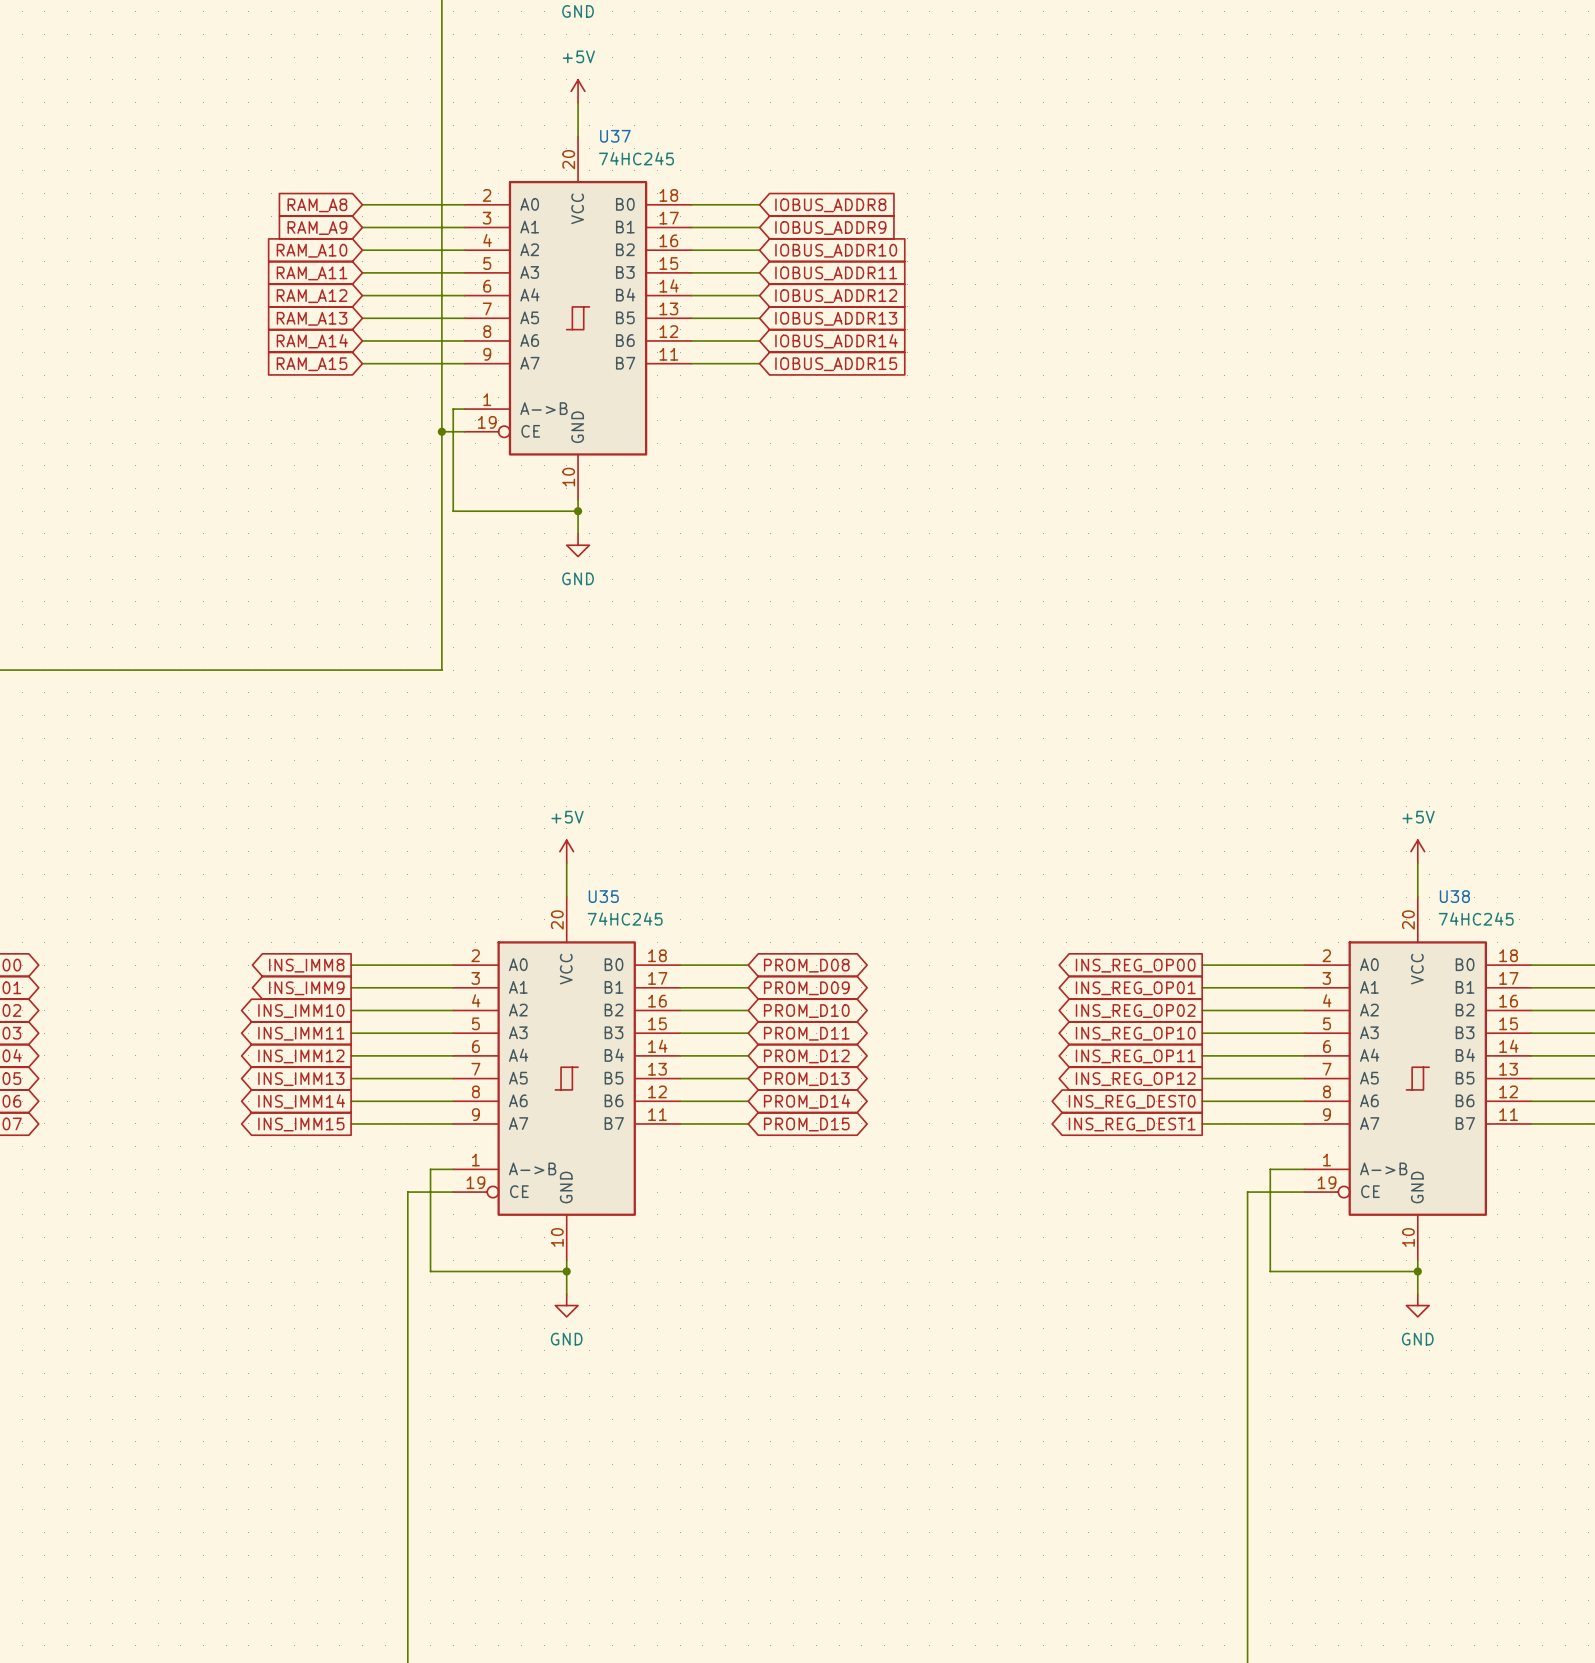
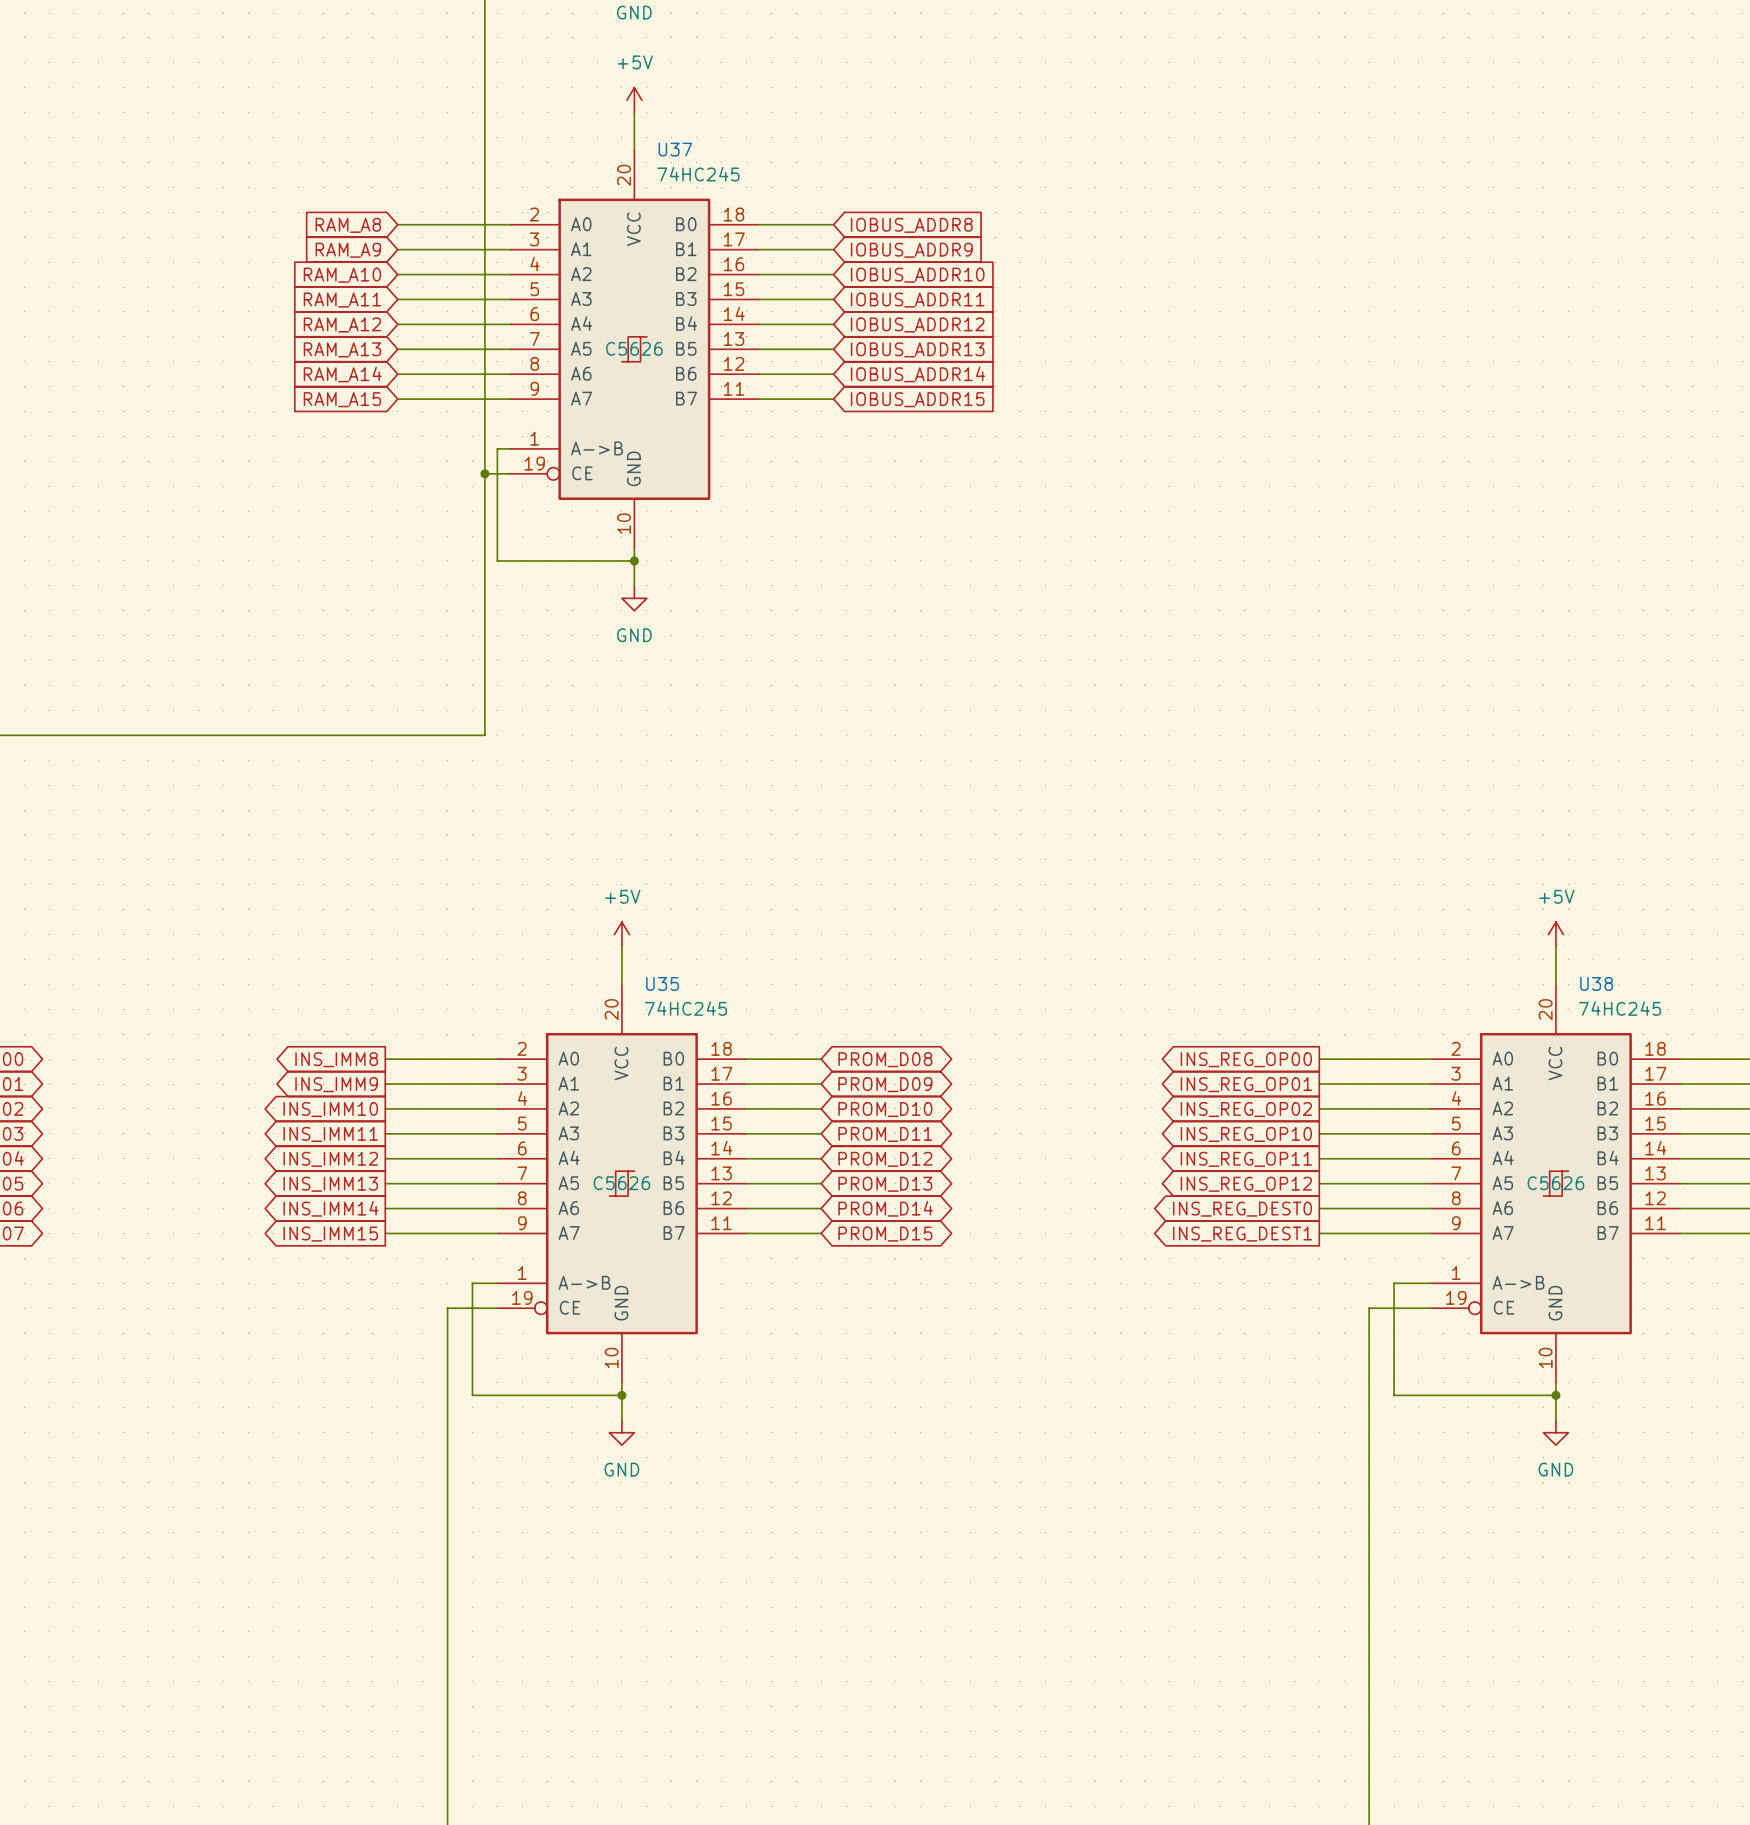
U37 text: none -> C5626 (634, 348)
U35 text: none -> C5626 (621, 1183)
U38 text: none -> C5626 (1555, 1183)

